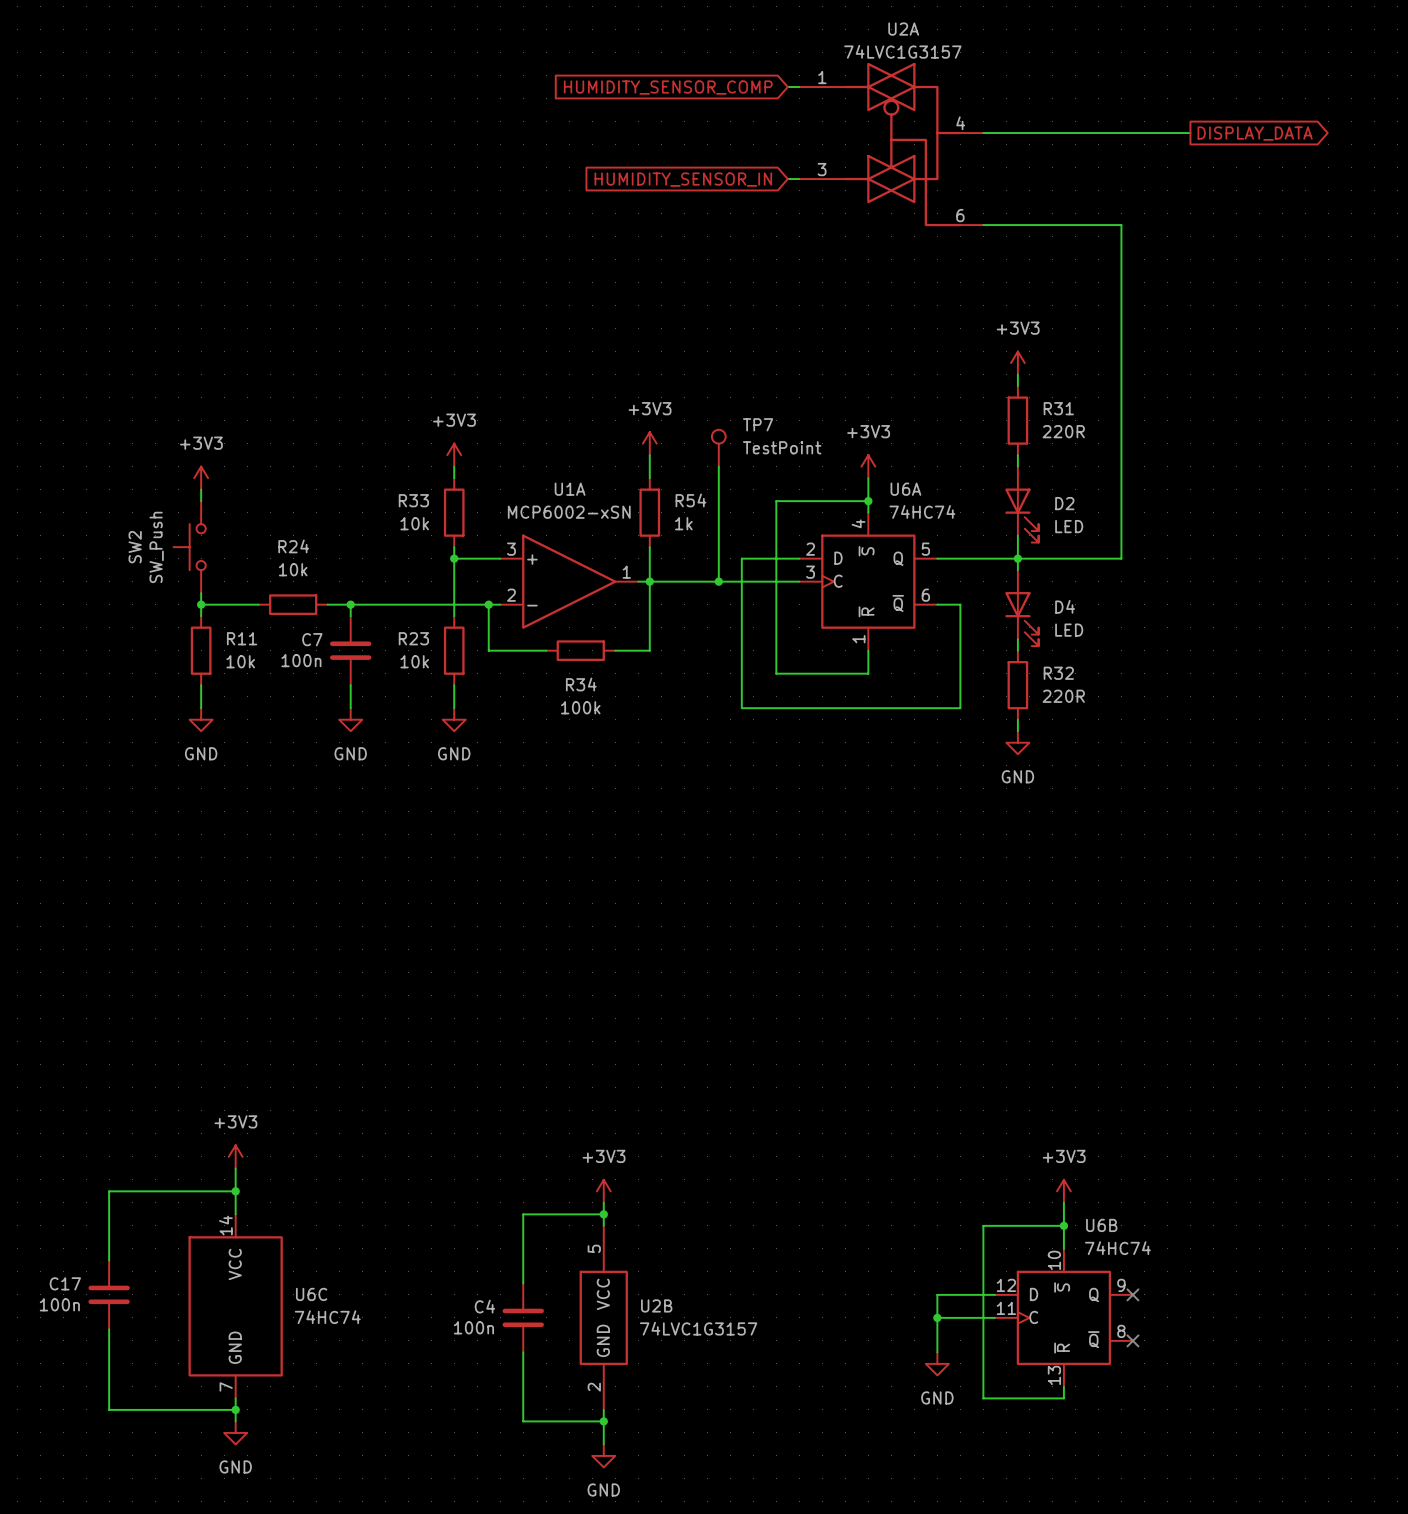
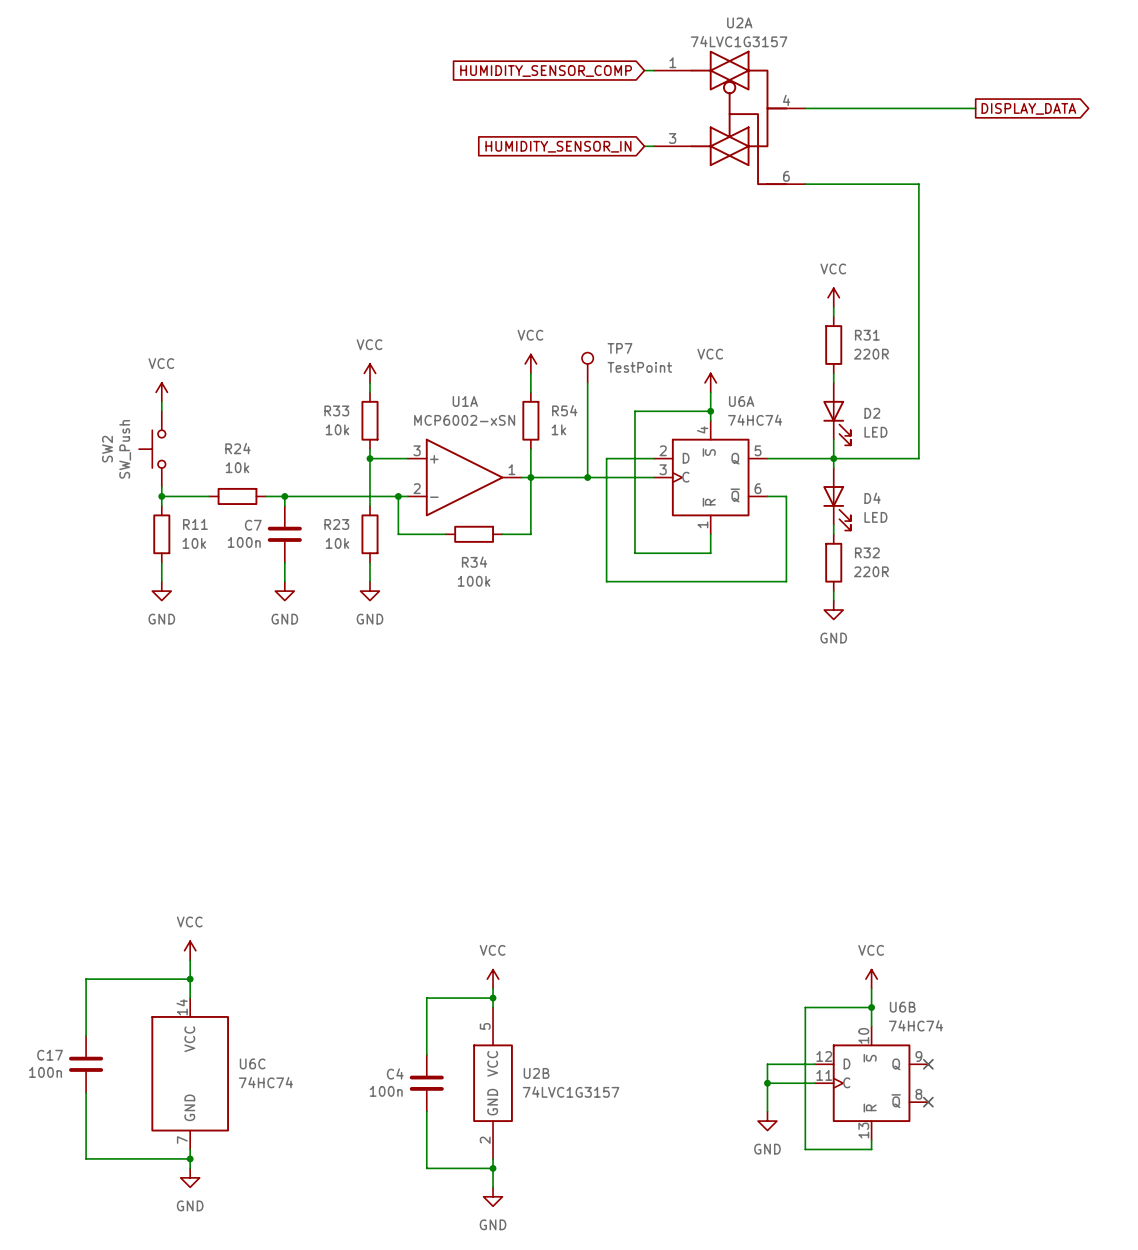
power symbol: +3V3 (1017, 363) -> VCC (833, 297)
power symbol: +3V3 (649, 443) -> VCC (530, 363)
power symbol: +3V3 (454, 455) -> VCC (369, 373)
power symbol: +3V3 (868, 466) -> VCC (710, 382)
power symbol: +3V3 (201, 478) -> VCC (161, 392)
power symbol: +3V3 (235, 1156) -> VCC (190, 950)
power symbol: +3V3 (603, 1191) -> VCC (493, 979)
power symbol: +3V3 (1063, 1191) -> VCC (871, 979)

